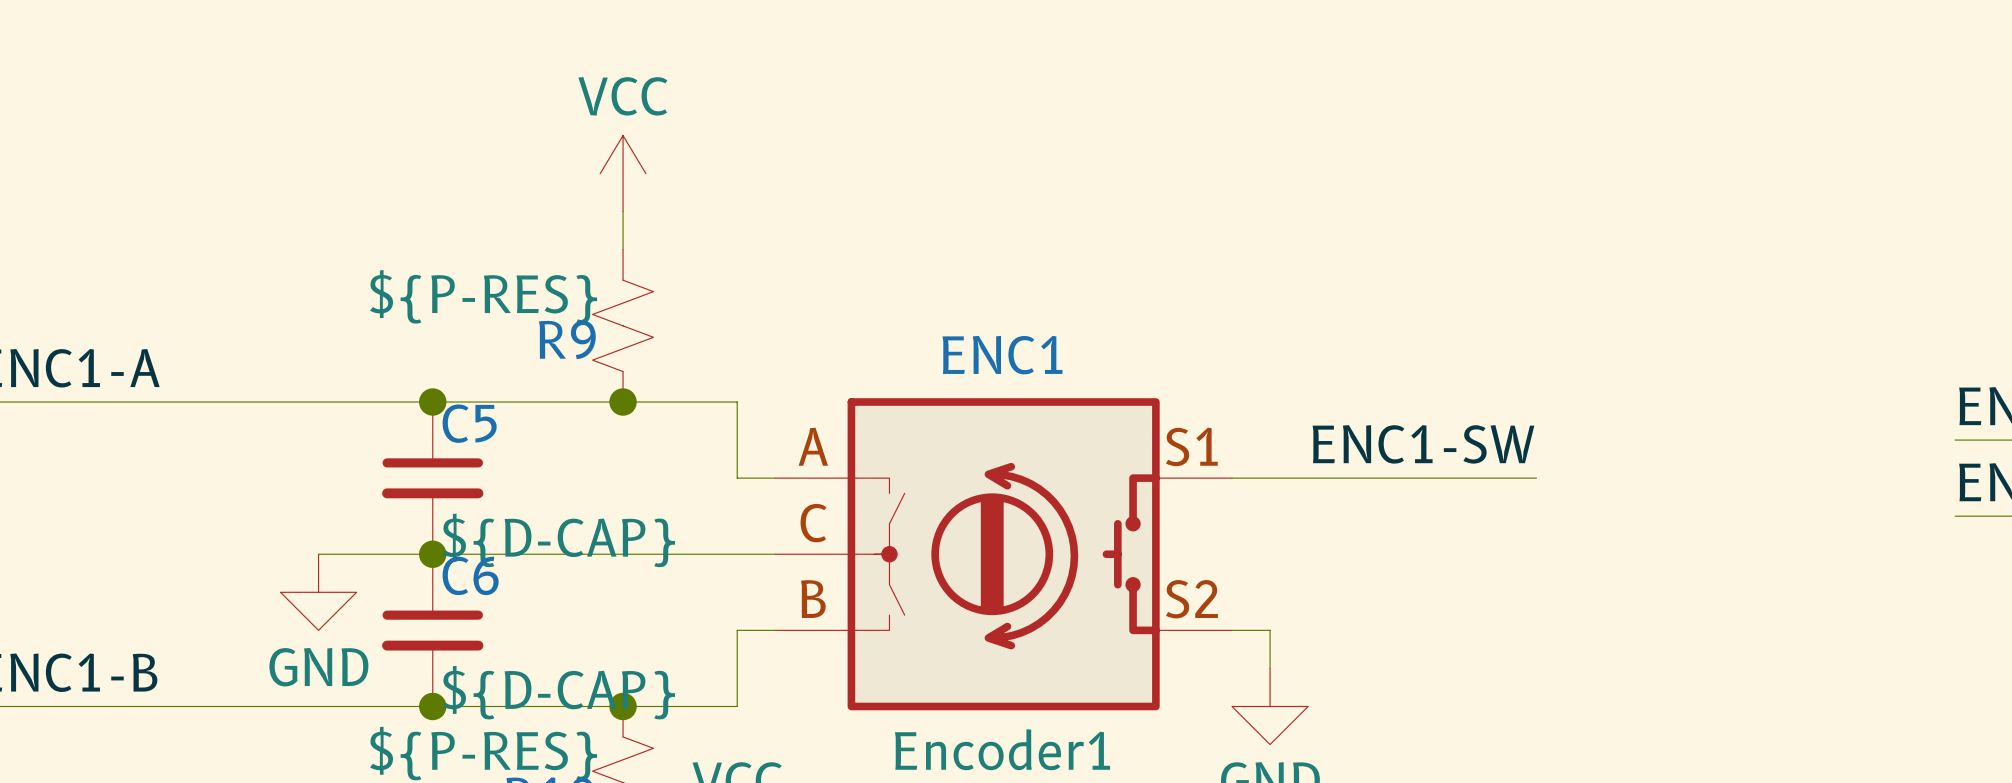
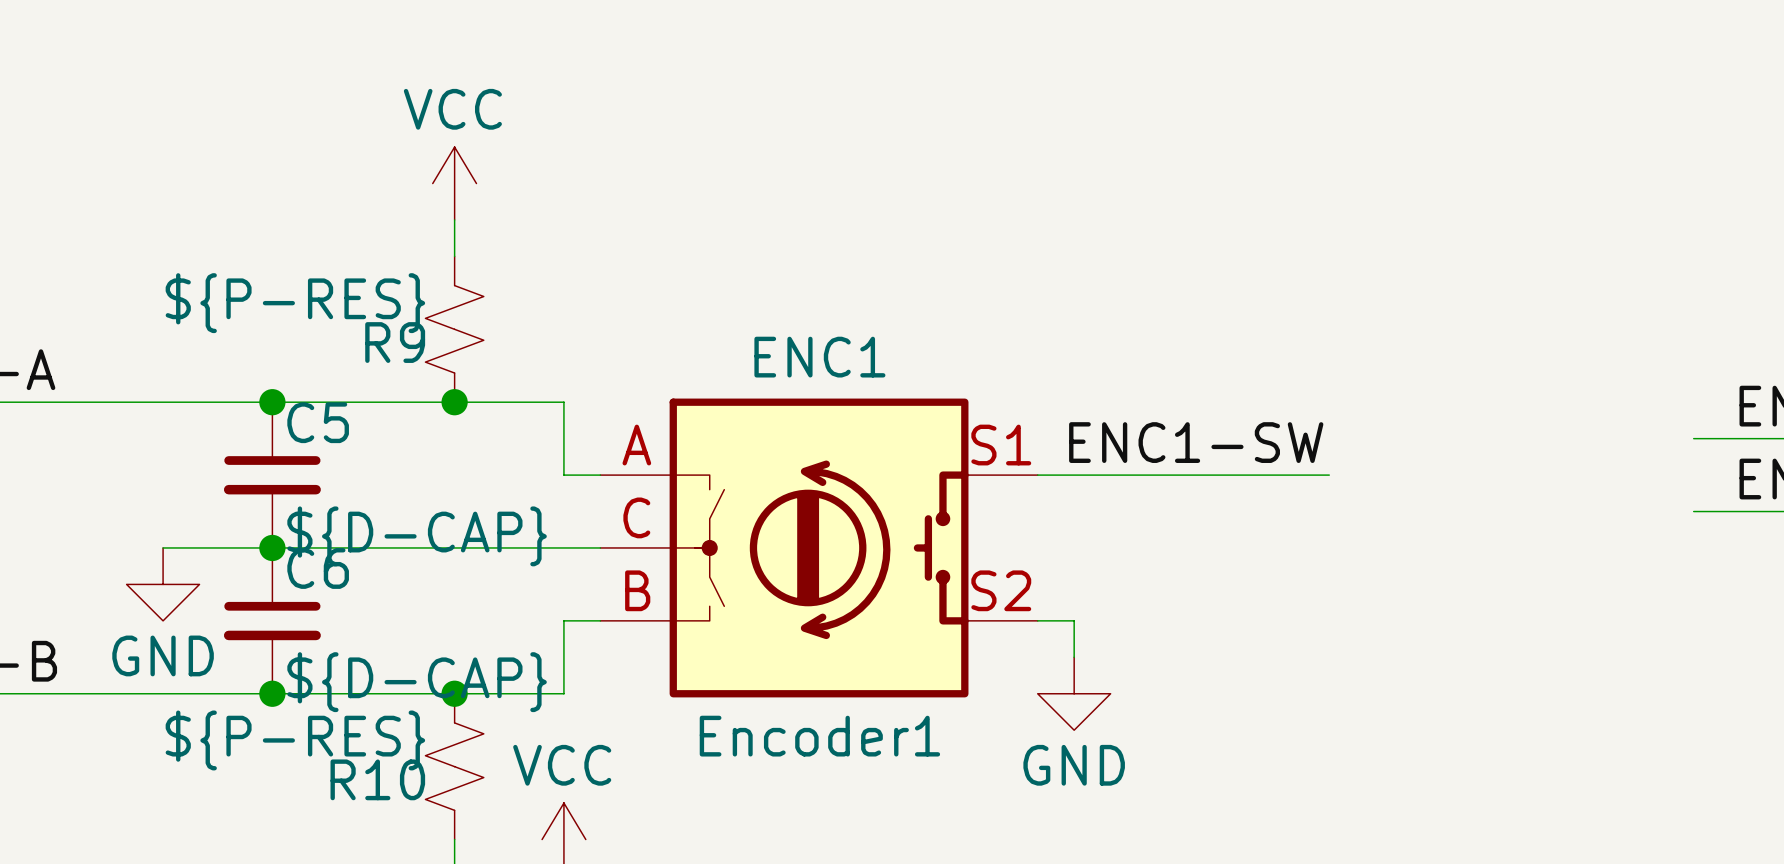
wire: none -> (1693, 438) (1730, 438)
wire: none -> (1693, 511) (1730, 511)

